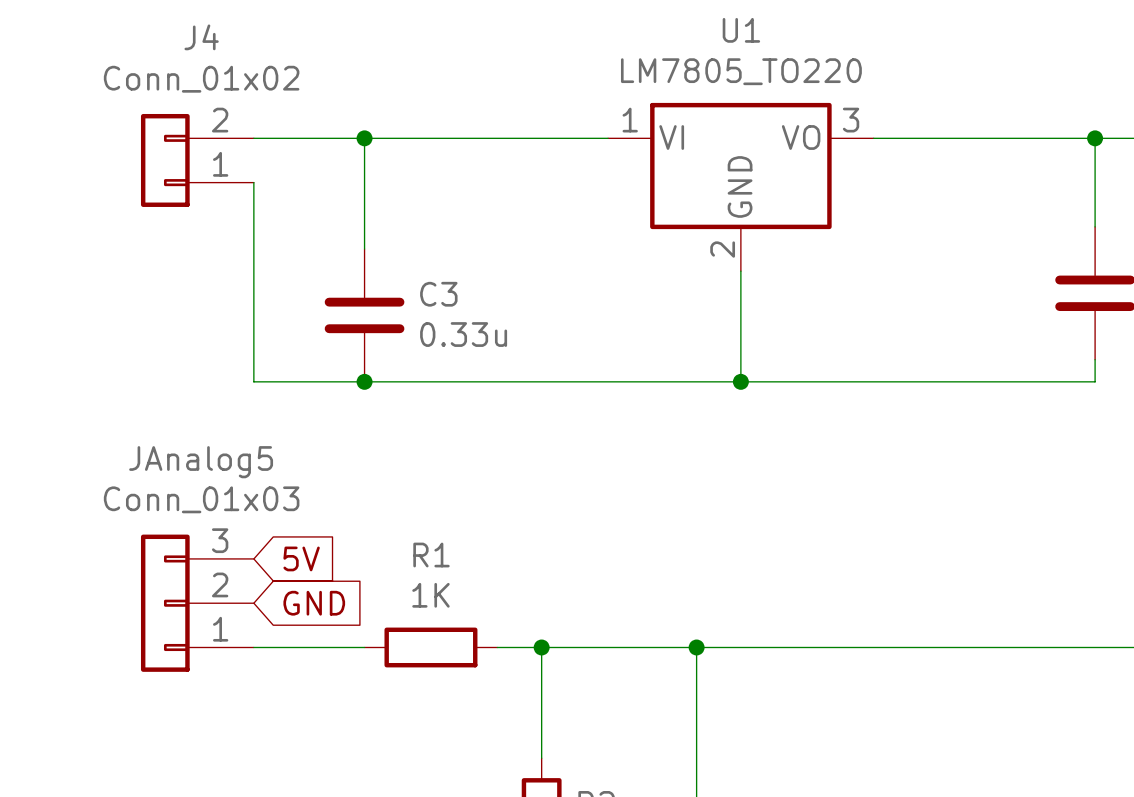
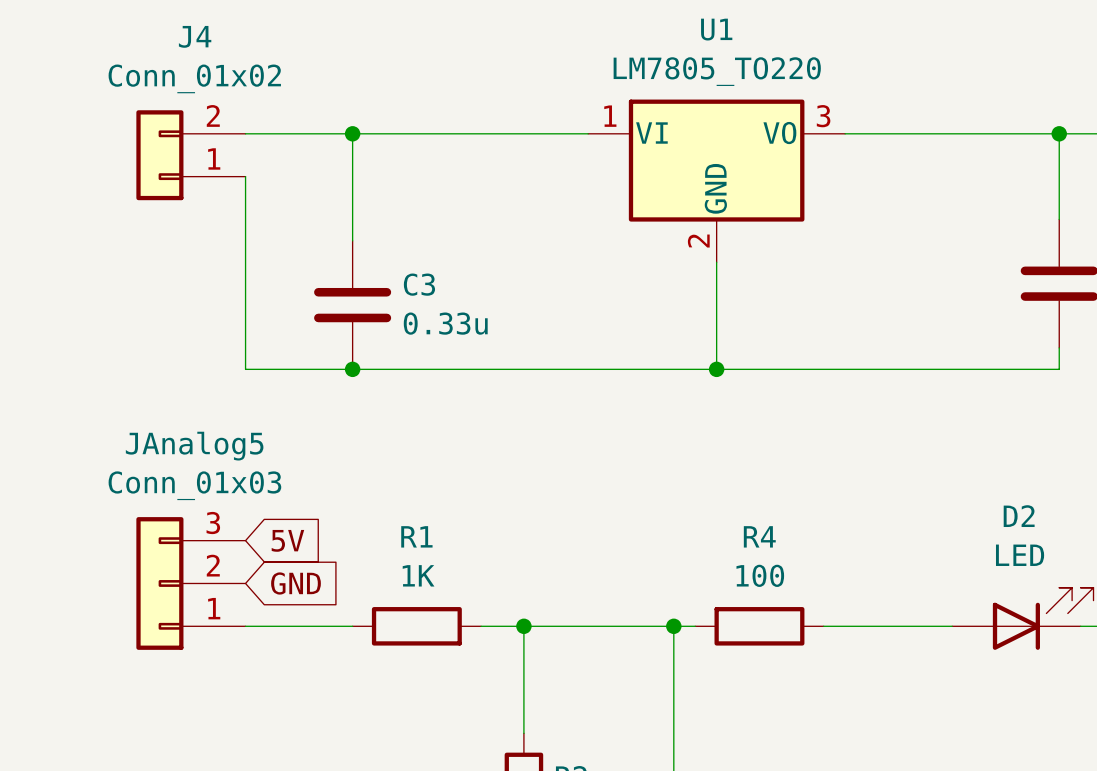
D2: none -> LED (1022, 618)
wire: (718, 647) (851, 647) -> none
R4: none -> 100 (759, 626)

